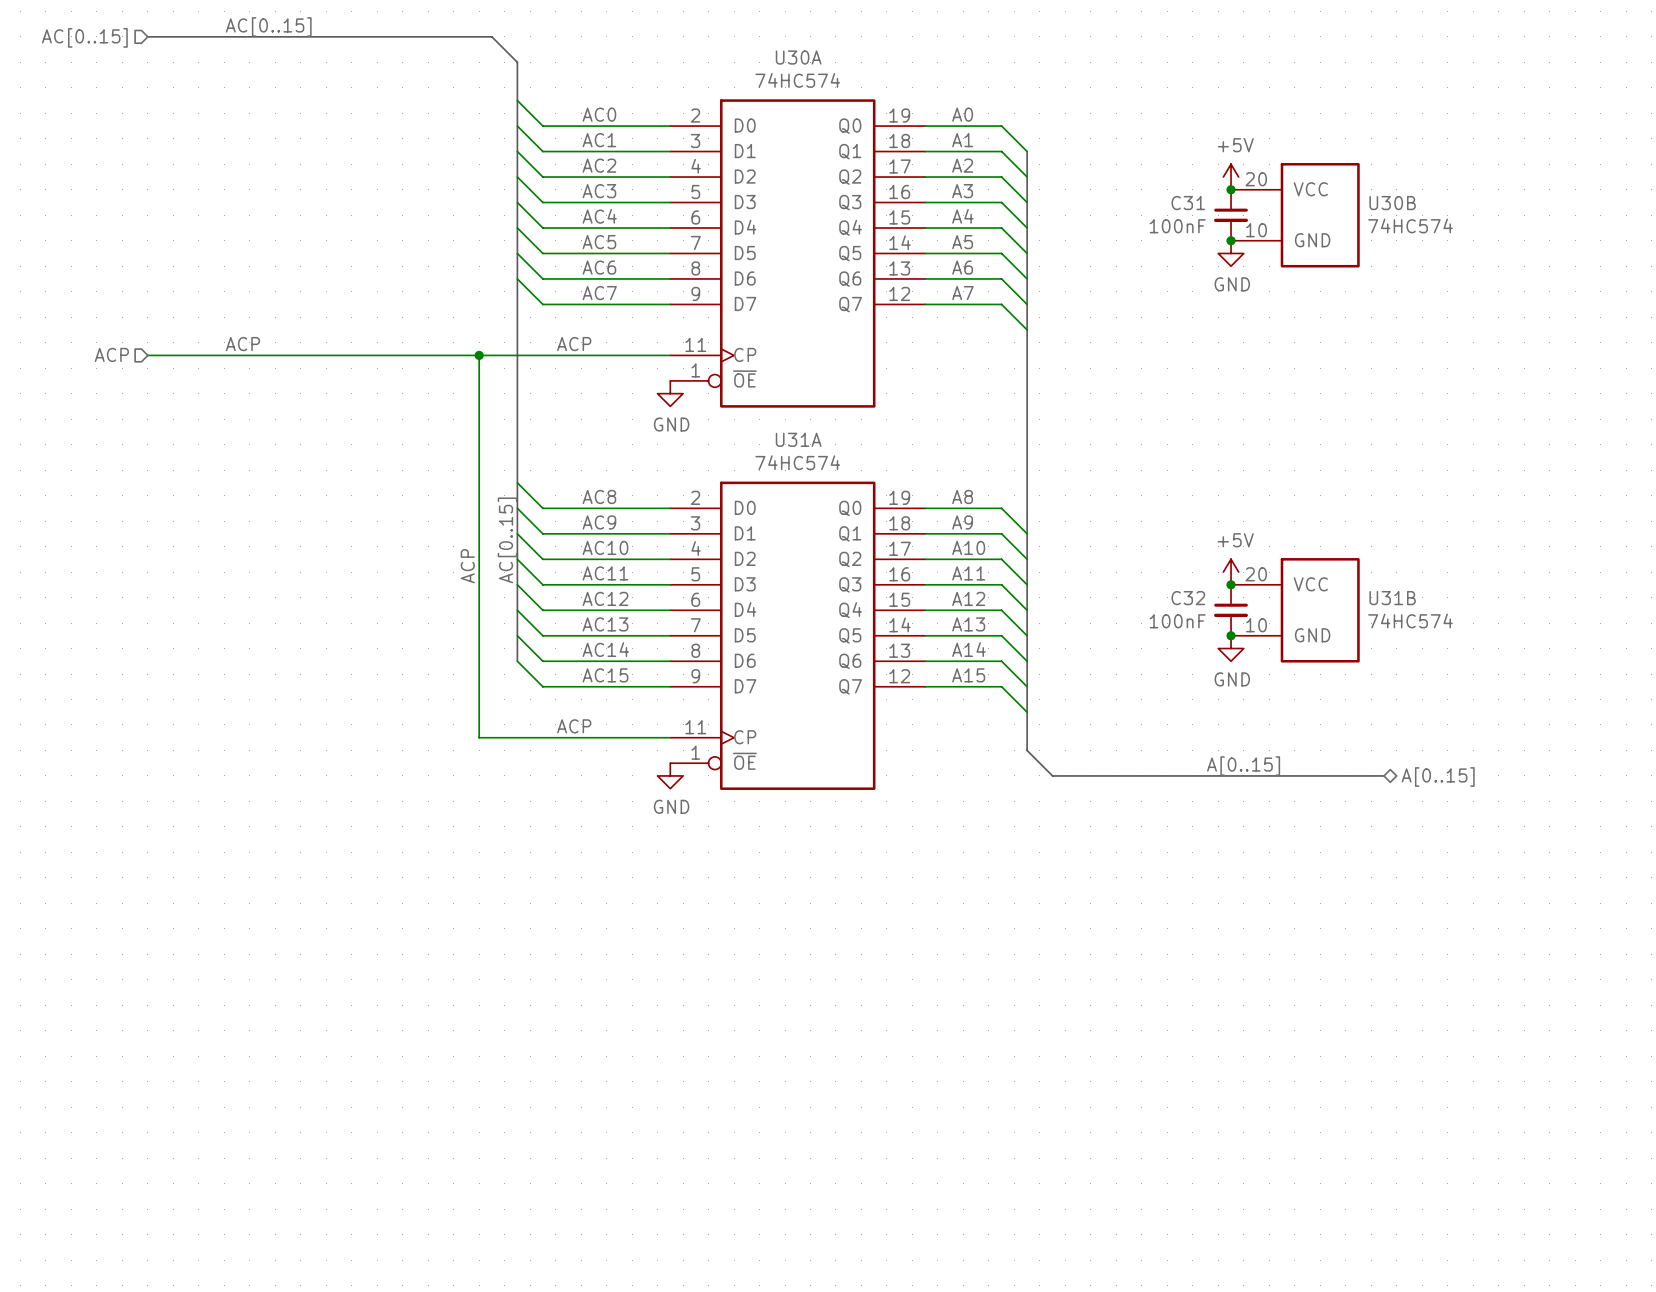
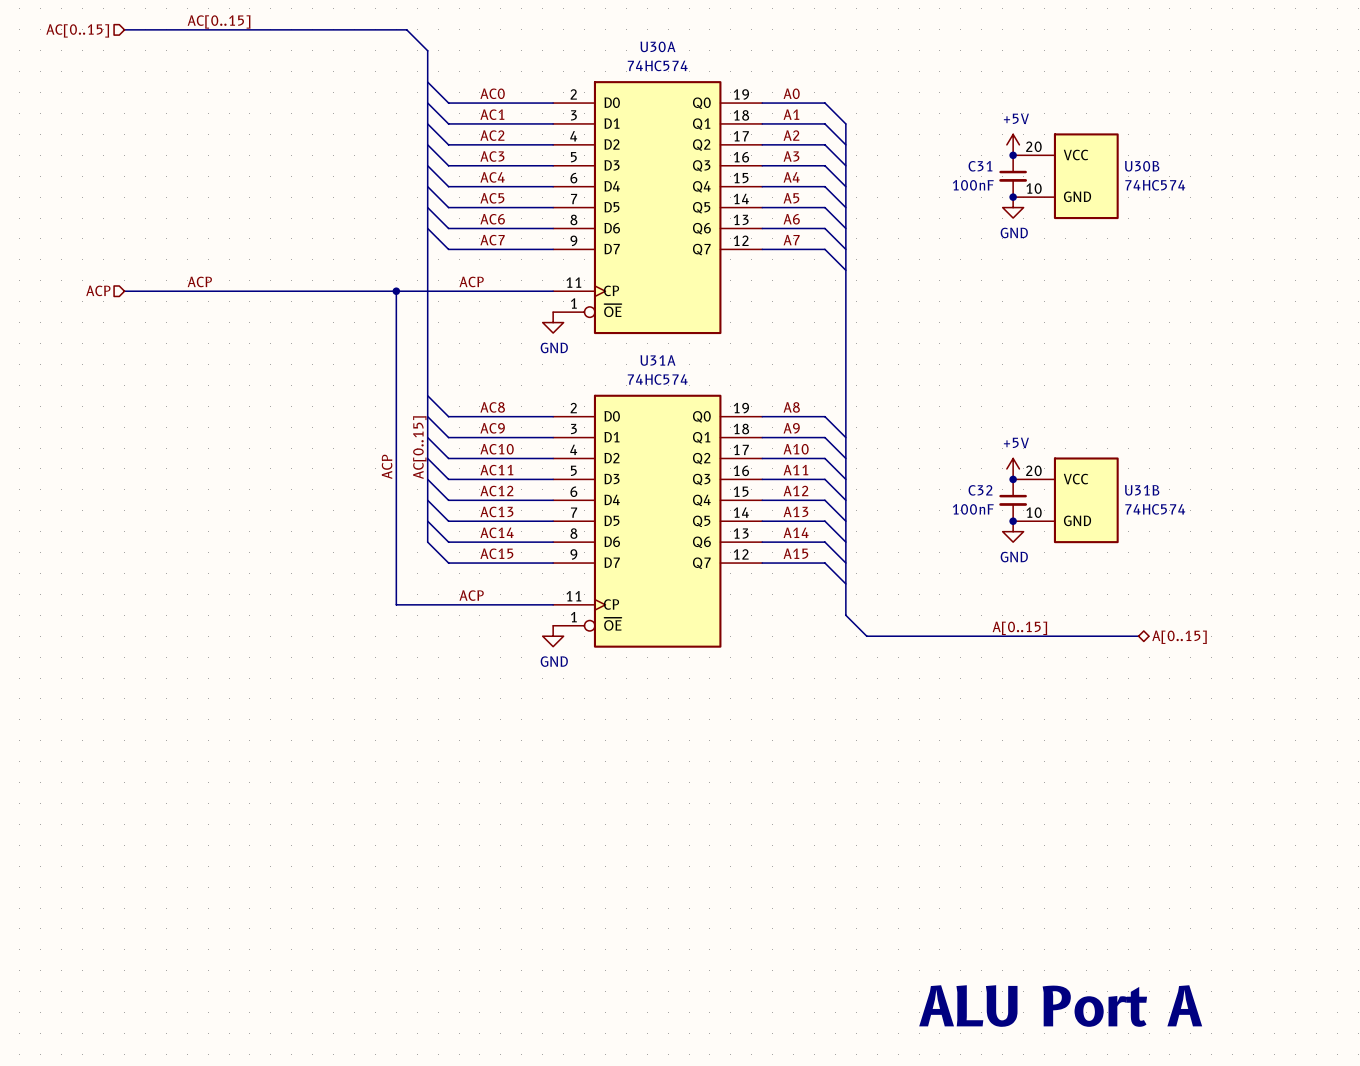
text: none -> ALU Port A (1060, 1006)

